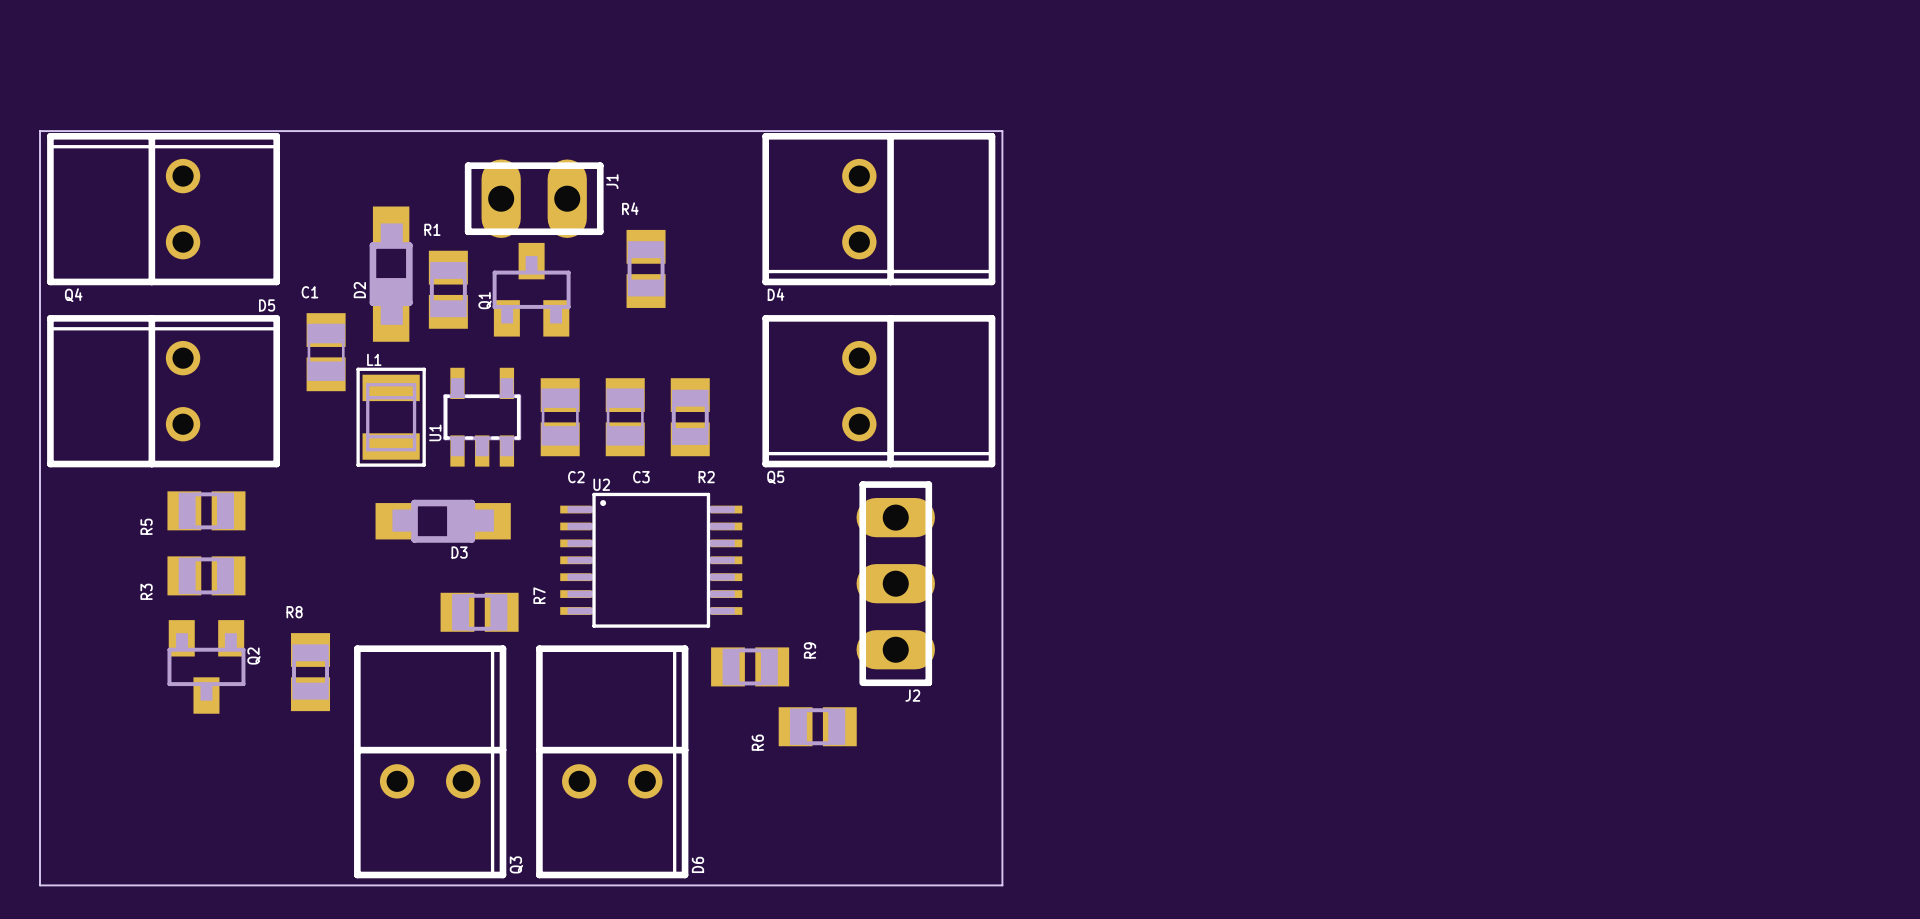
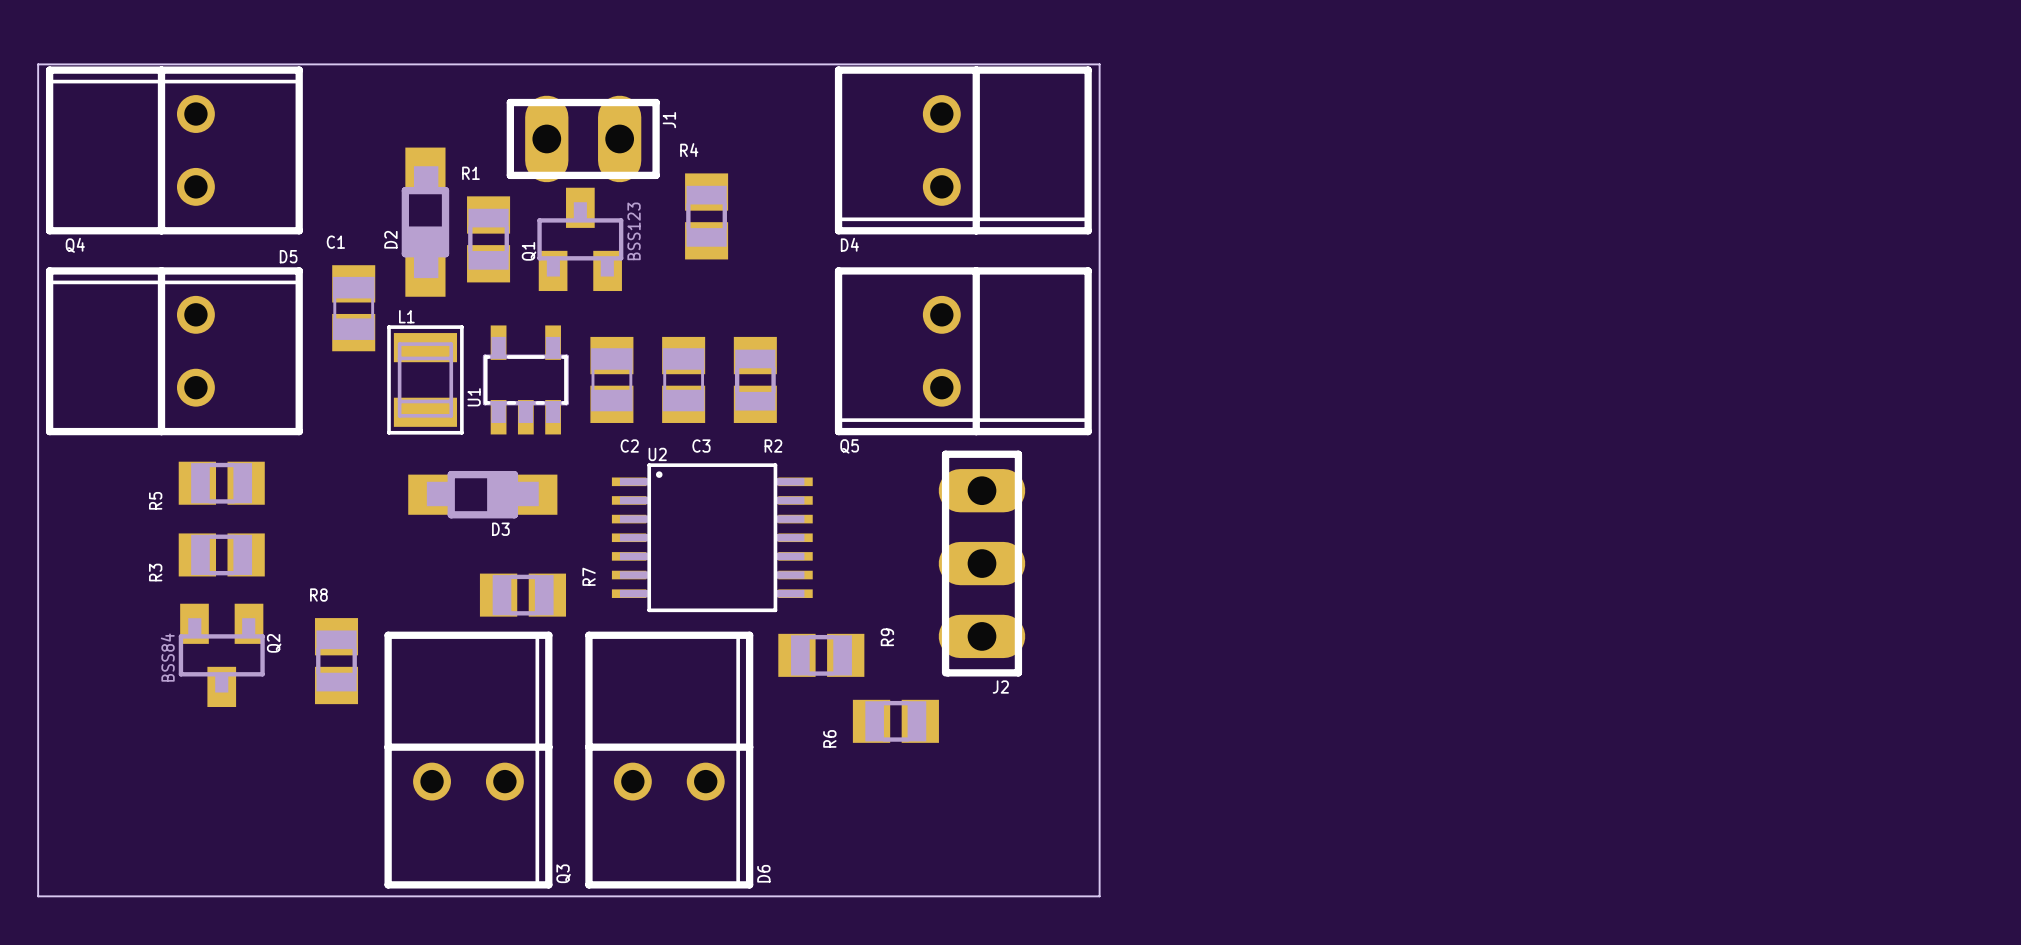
Q1 value: none -> BSS123 (634, 231)
Q2 value: none -> BSS84 (167, 657)

